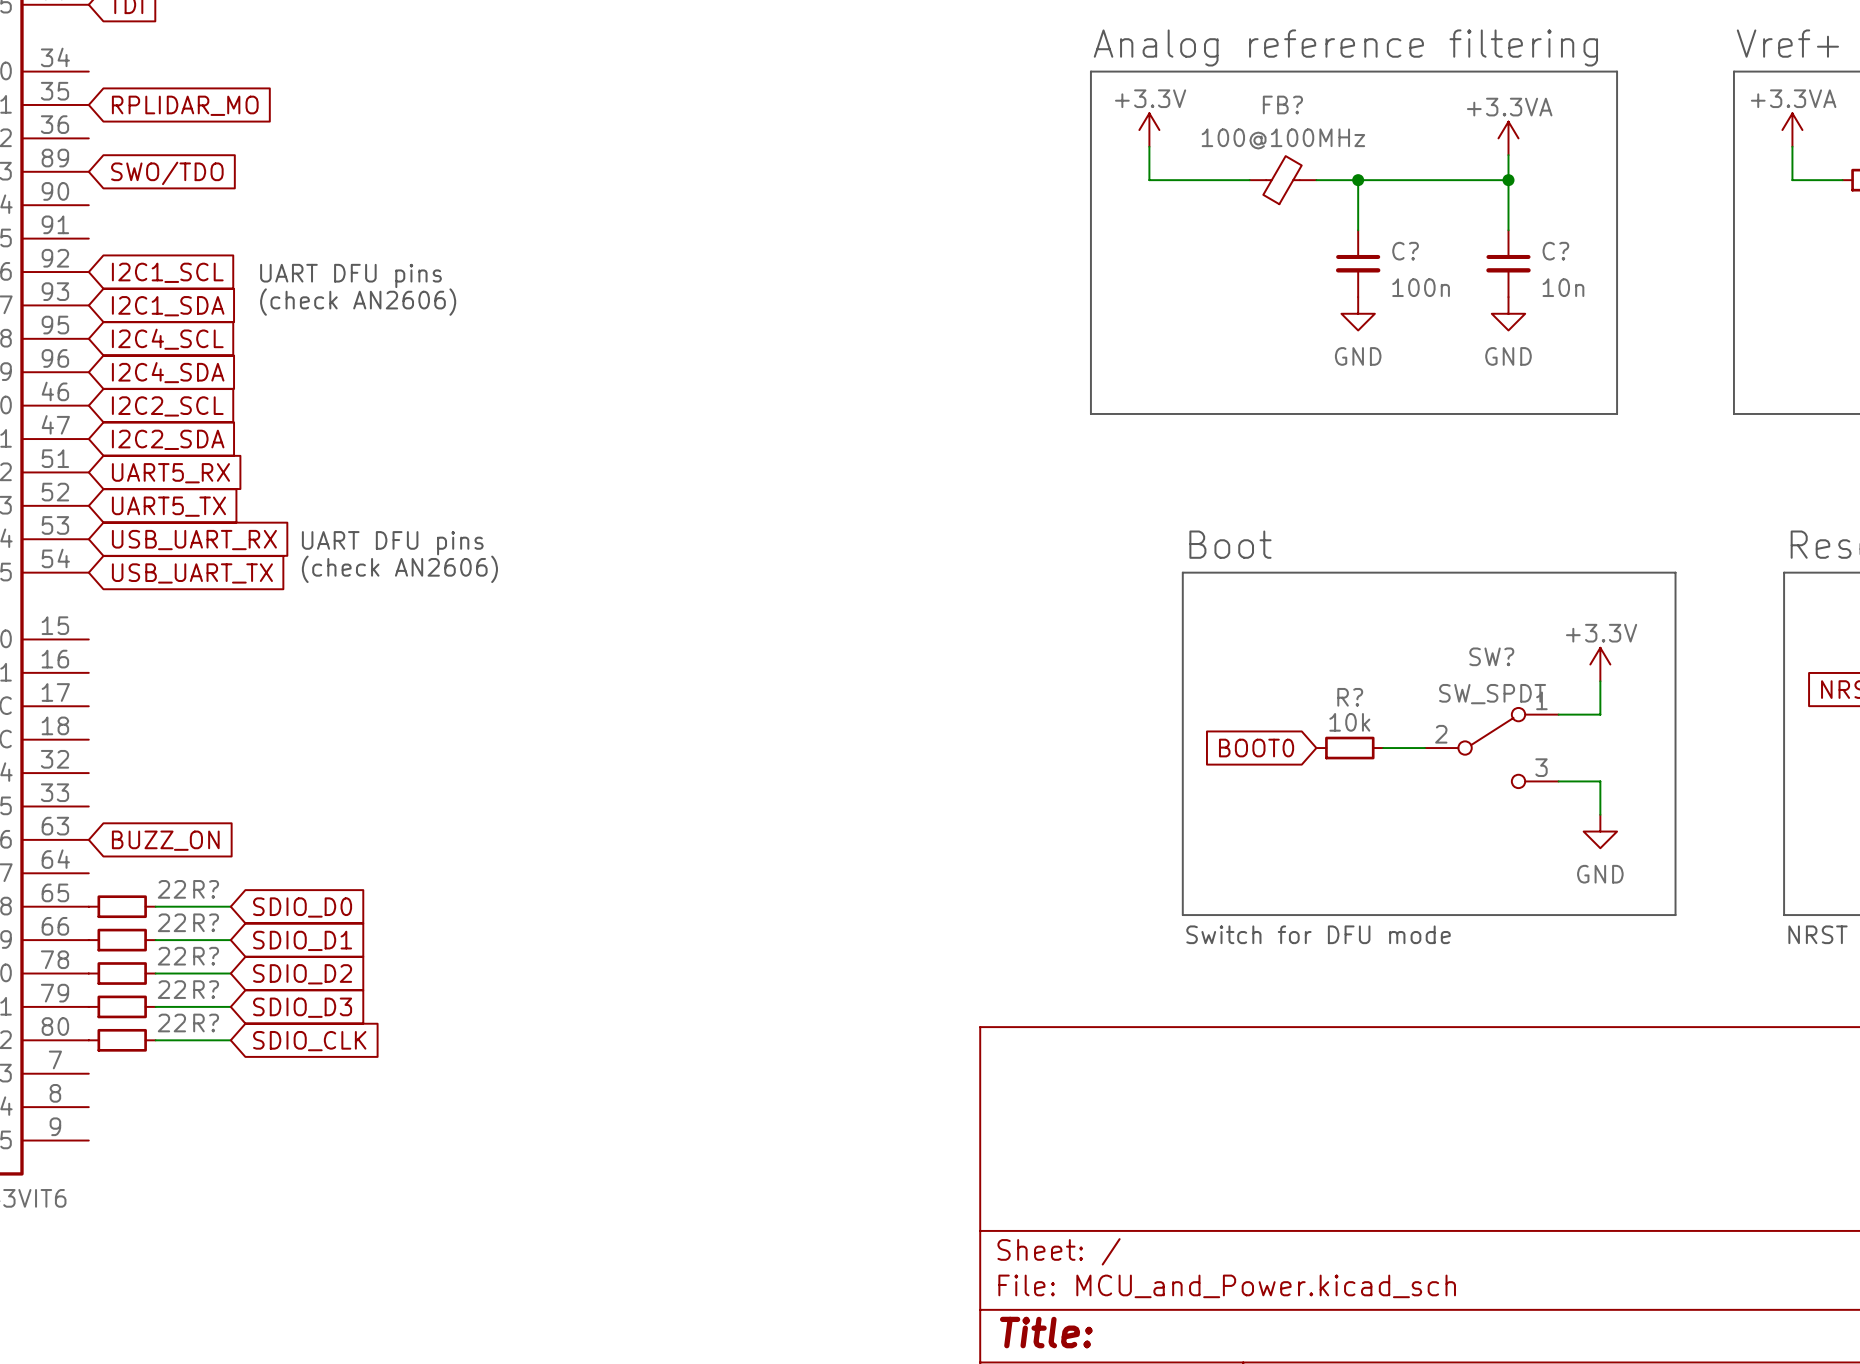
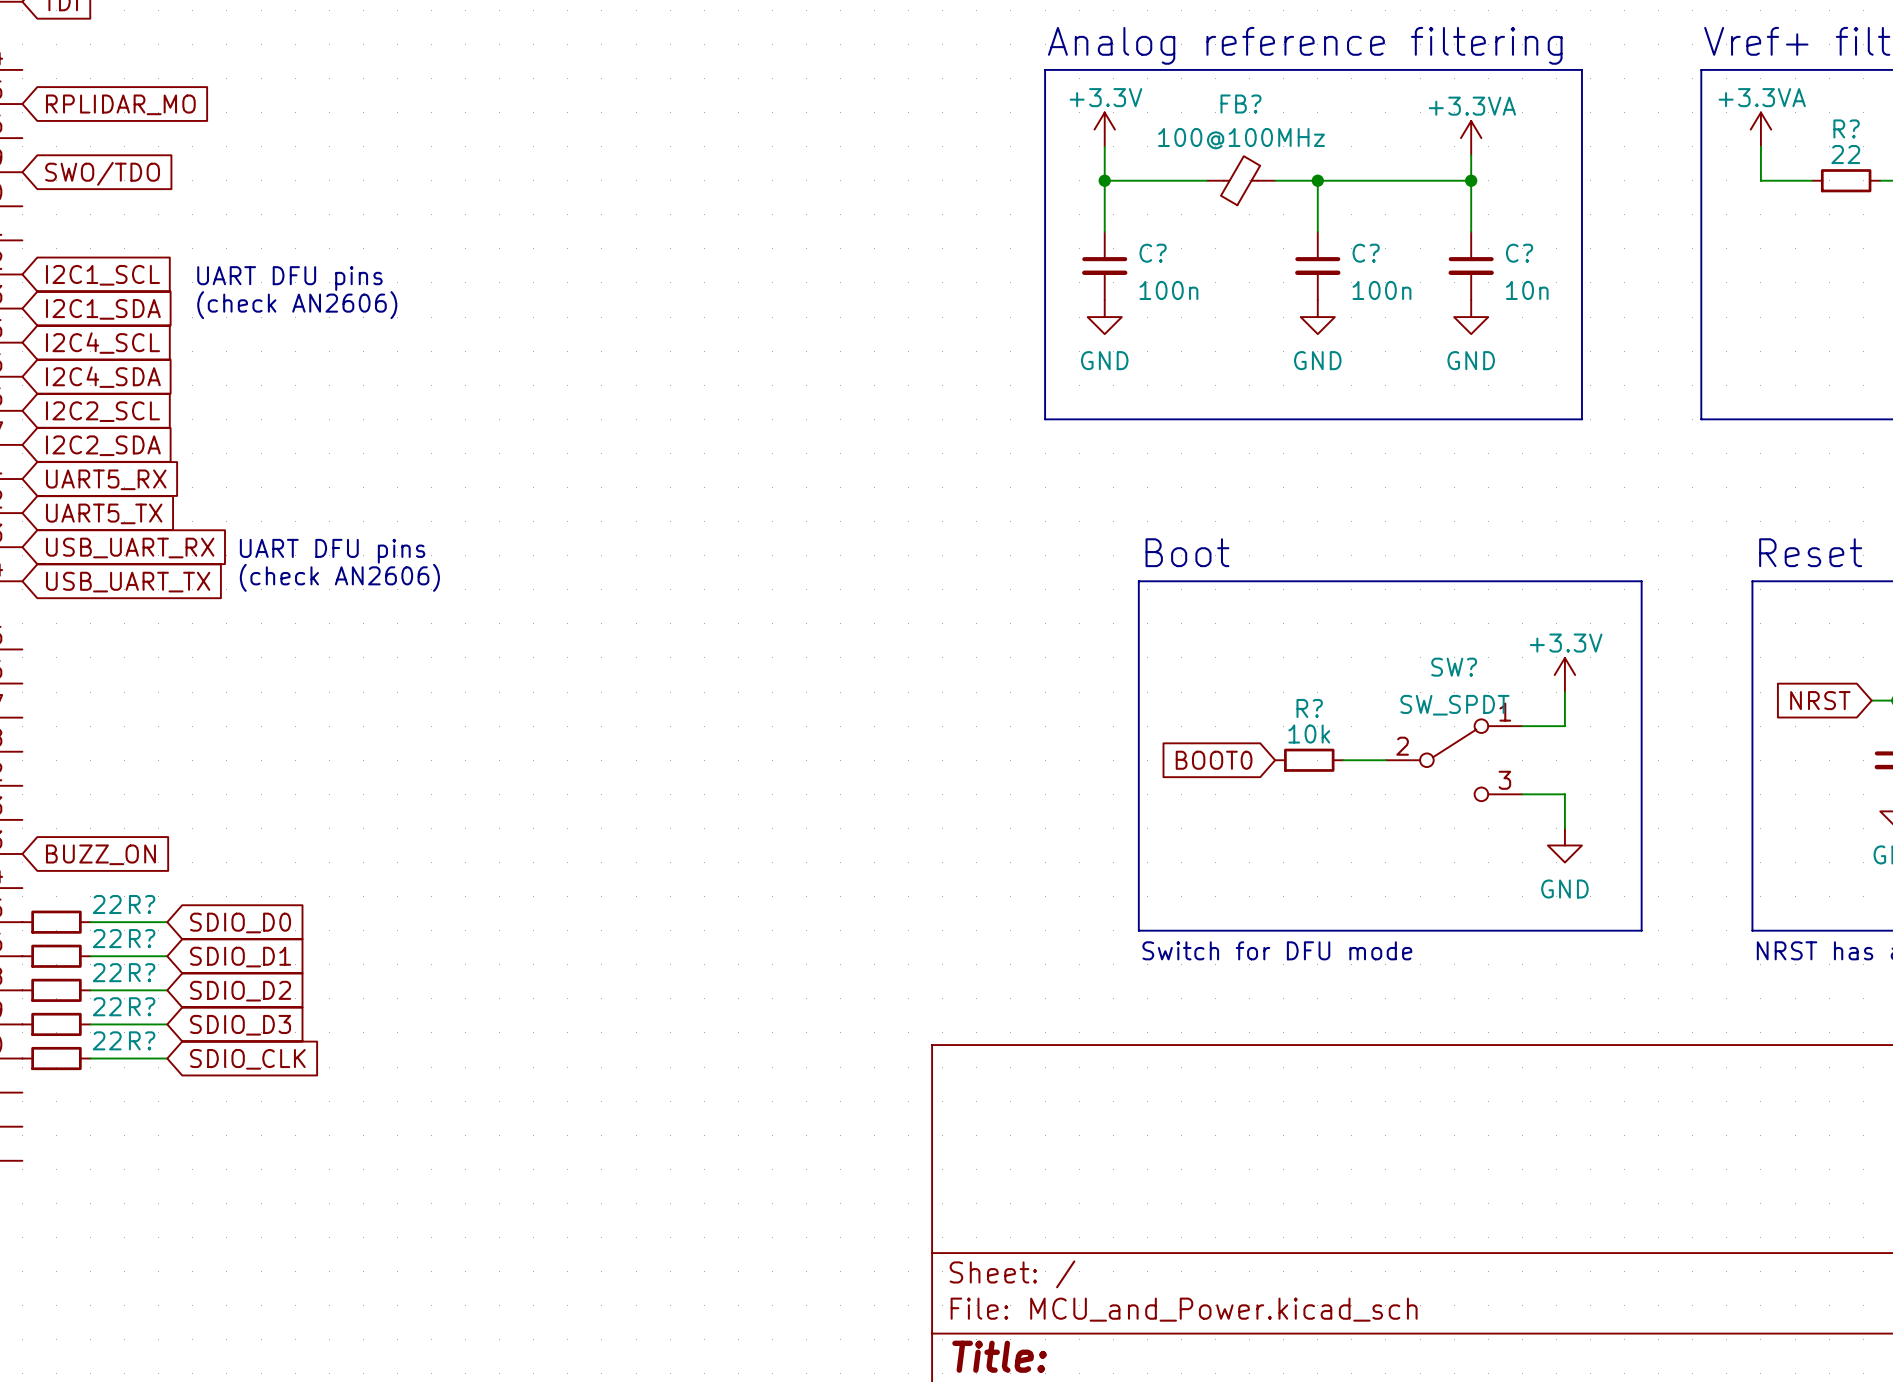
wire: none -> (1104, 180) (1104, 231)
junction: none -> (1104, 180)
C?: none -> 100n (1104, 265)
power symbol: none -> GND (1104, 317)

